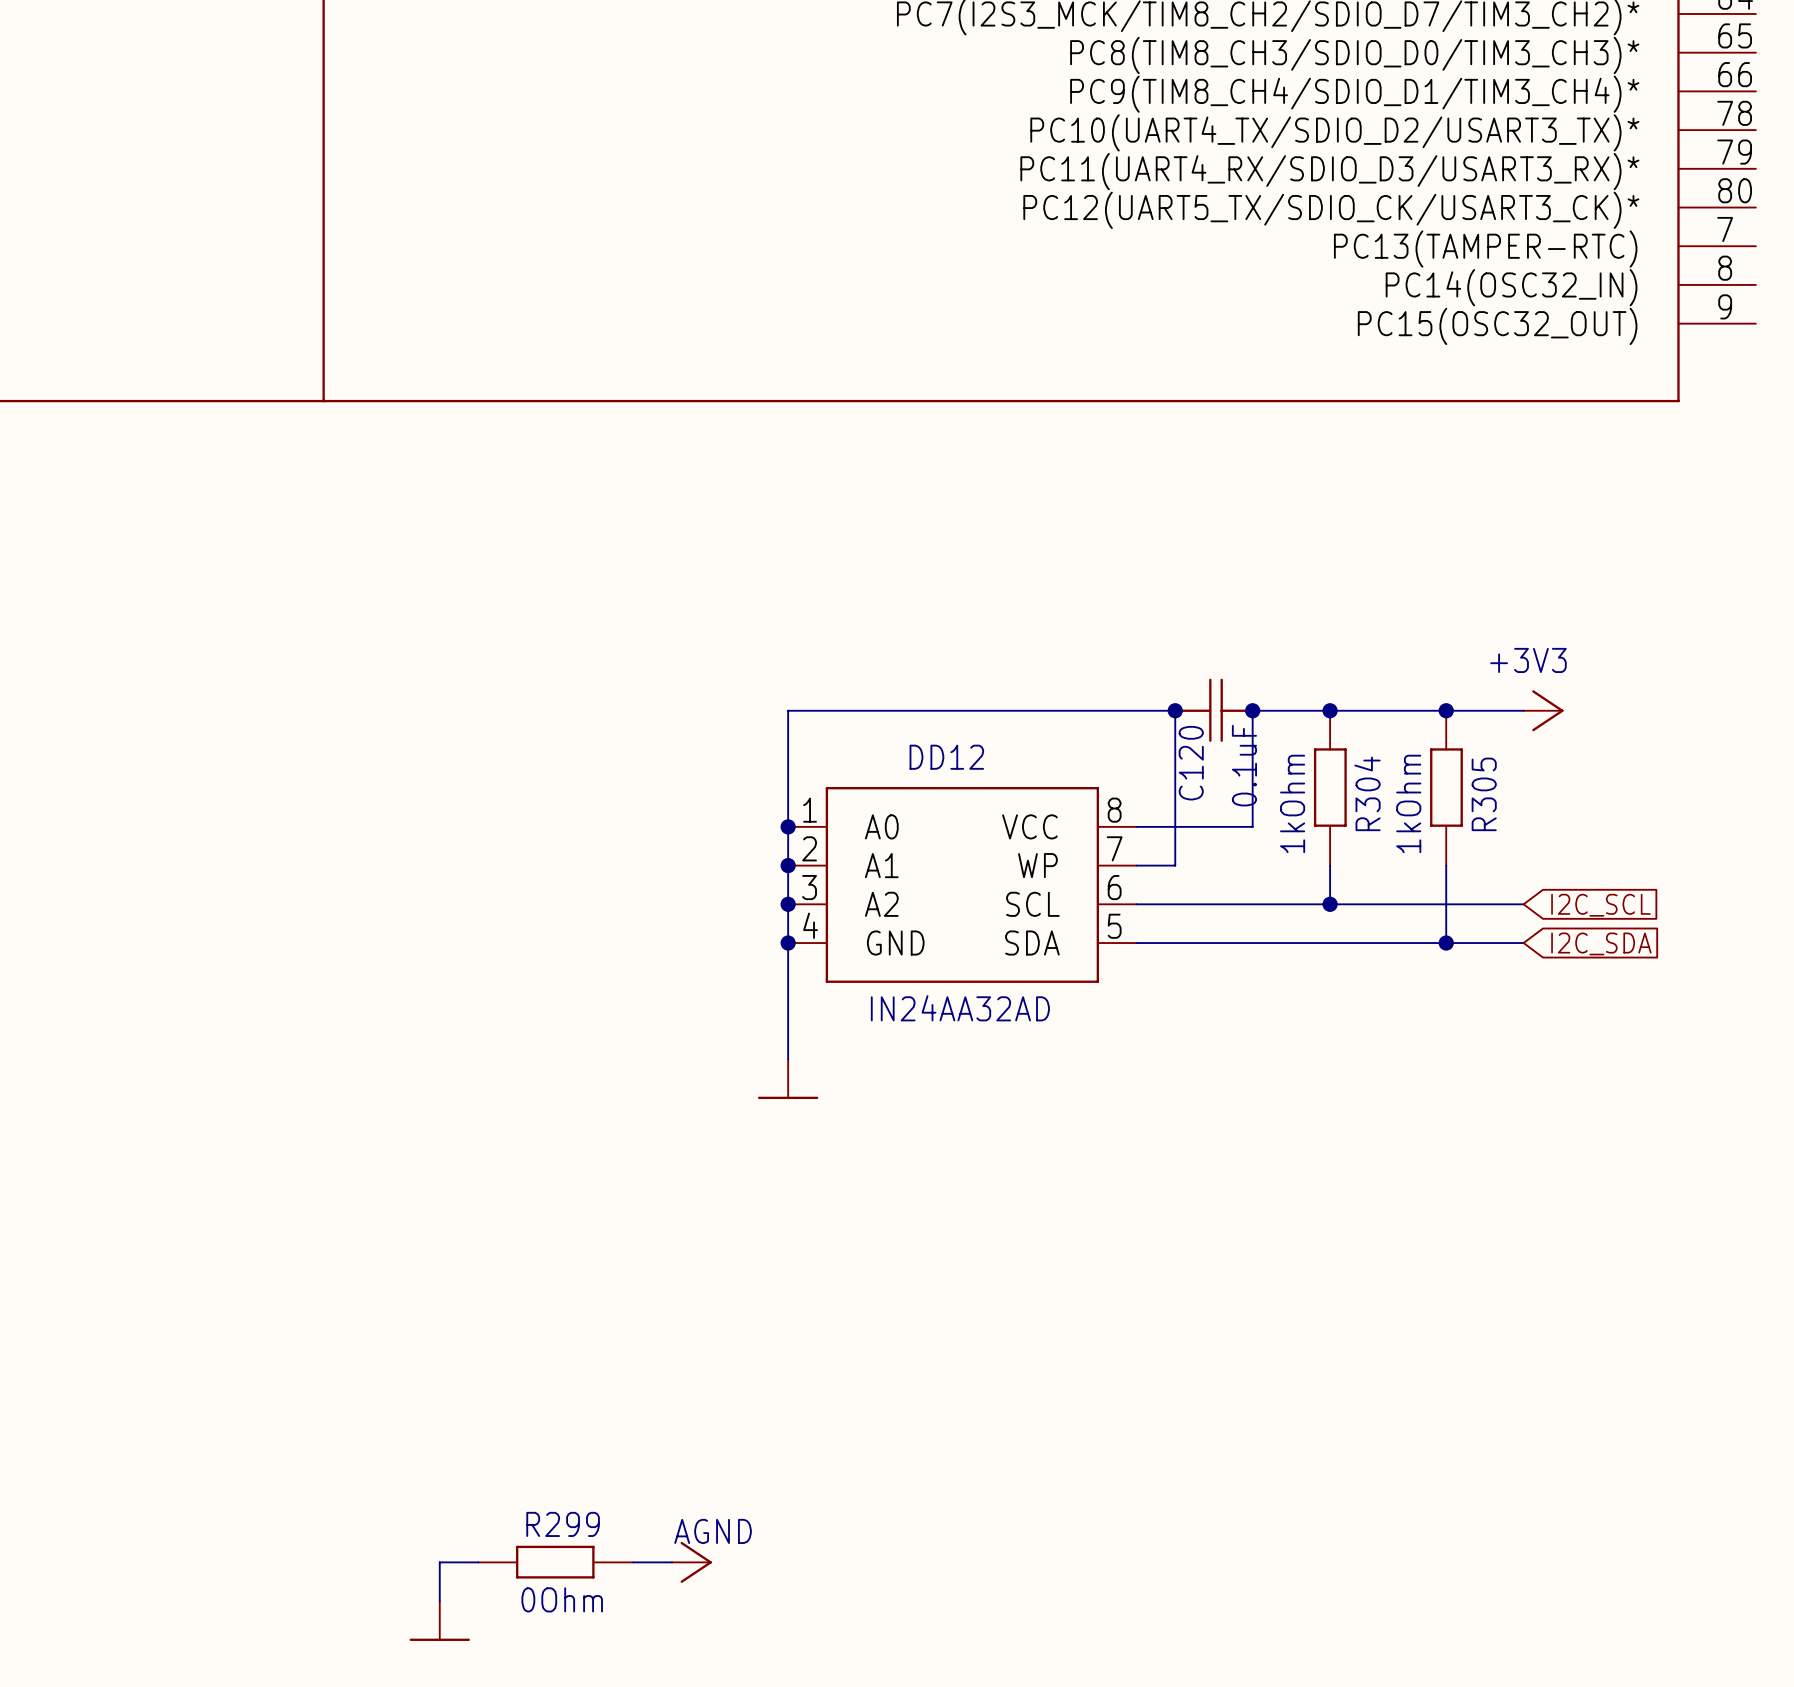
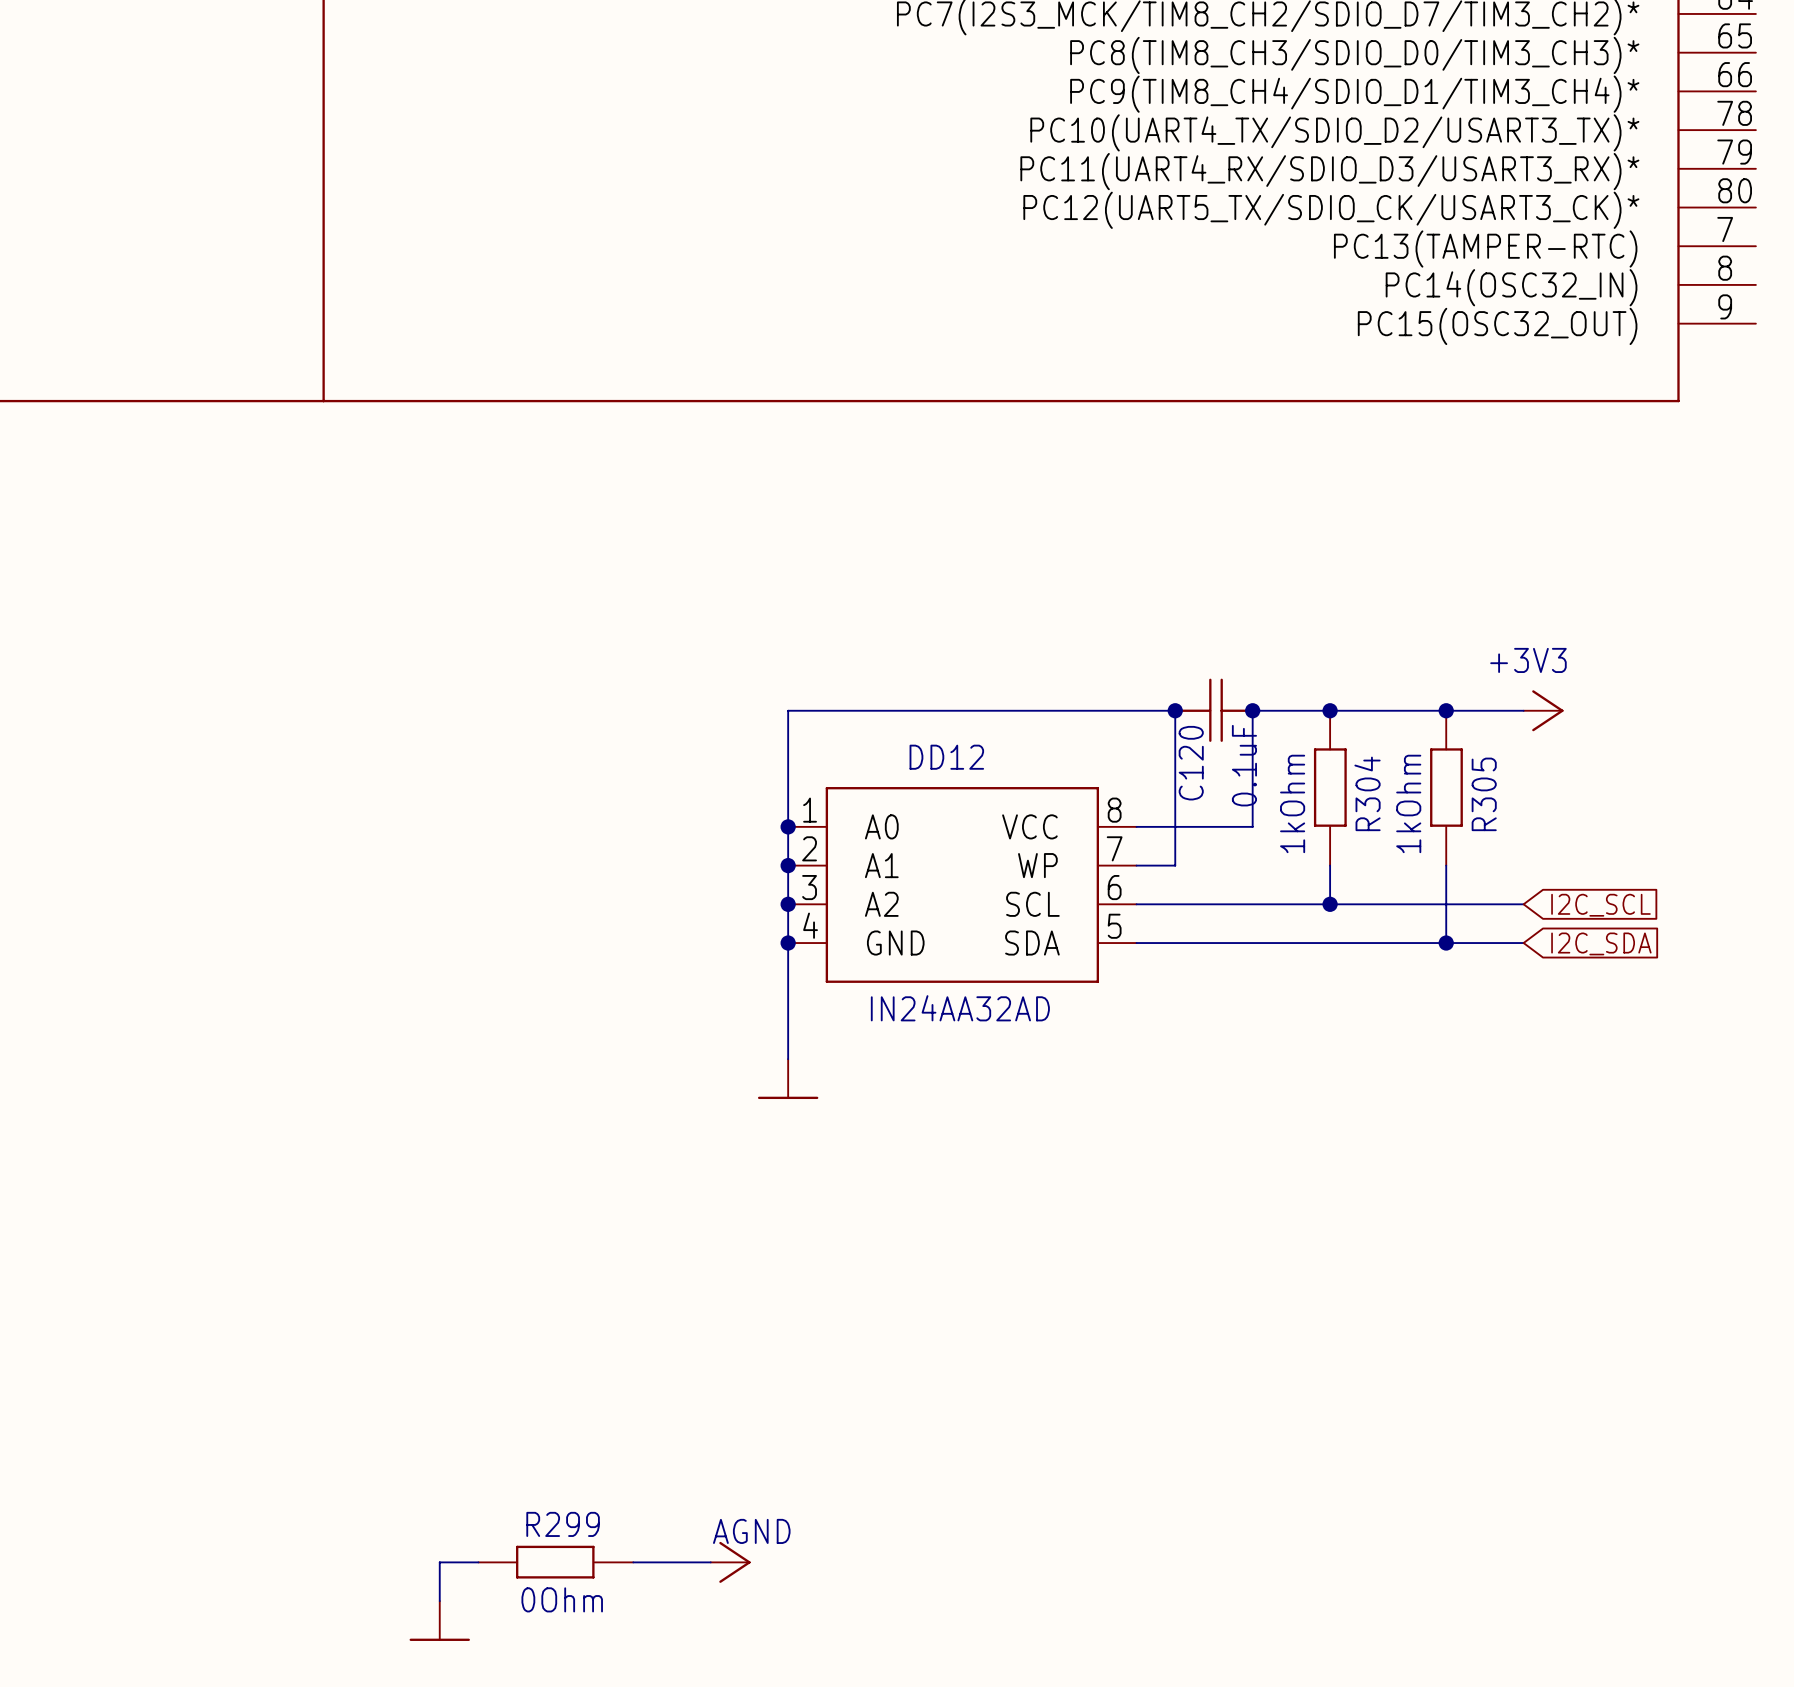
power symbol position: AGND (691, 1562) -> AGND (730, 1562)

